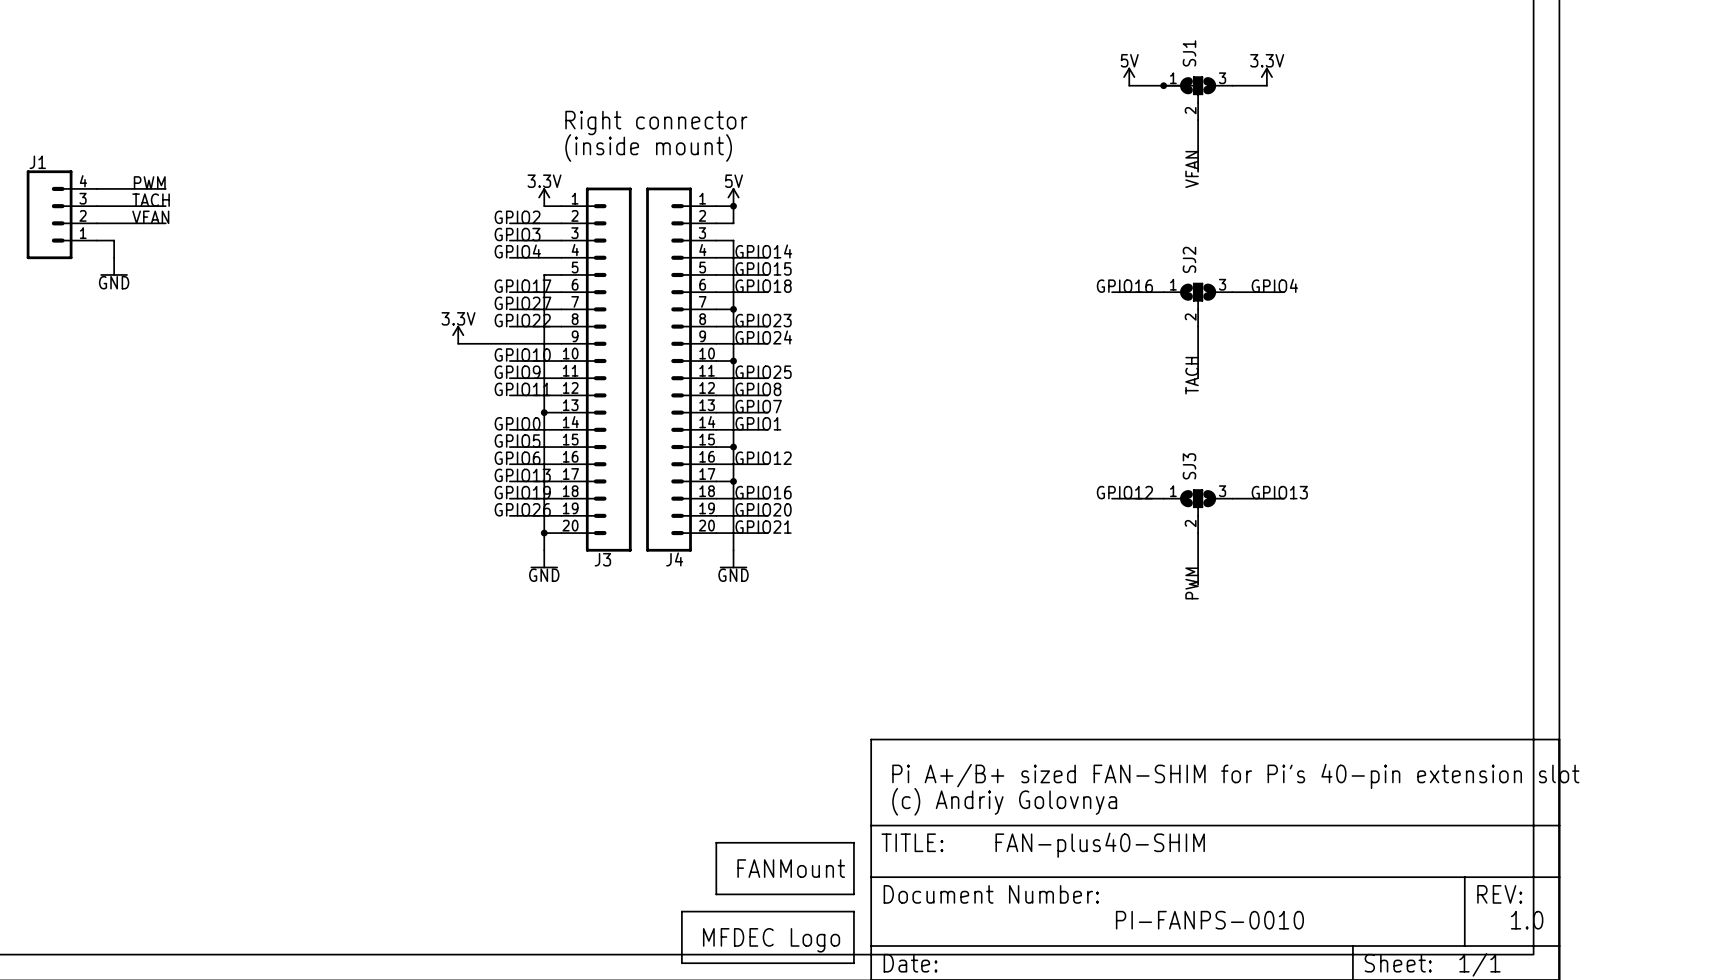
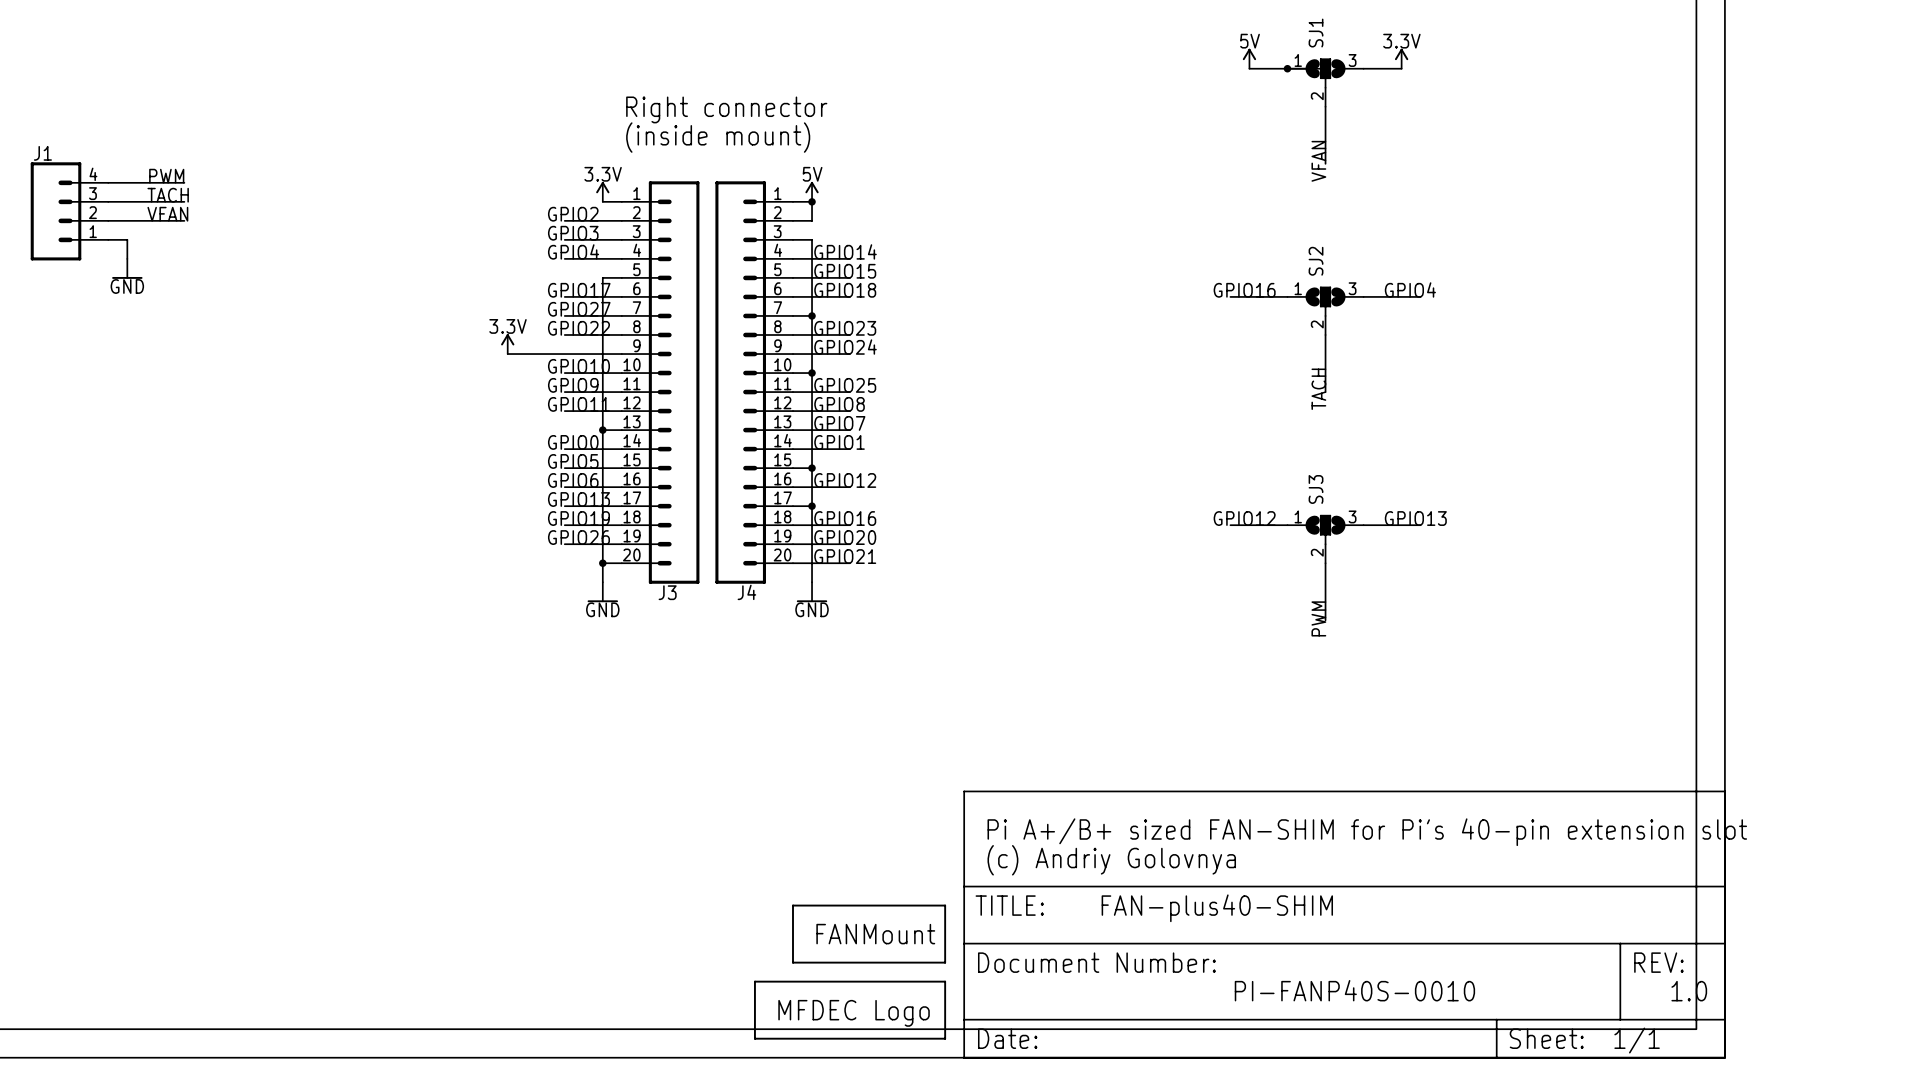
text: PI-FANPS-0010 (1209, 920) -> PI-FANP40S-0010 (1354, 990)

